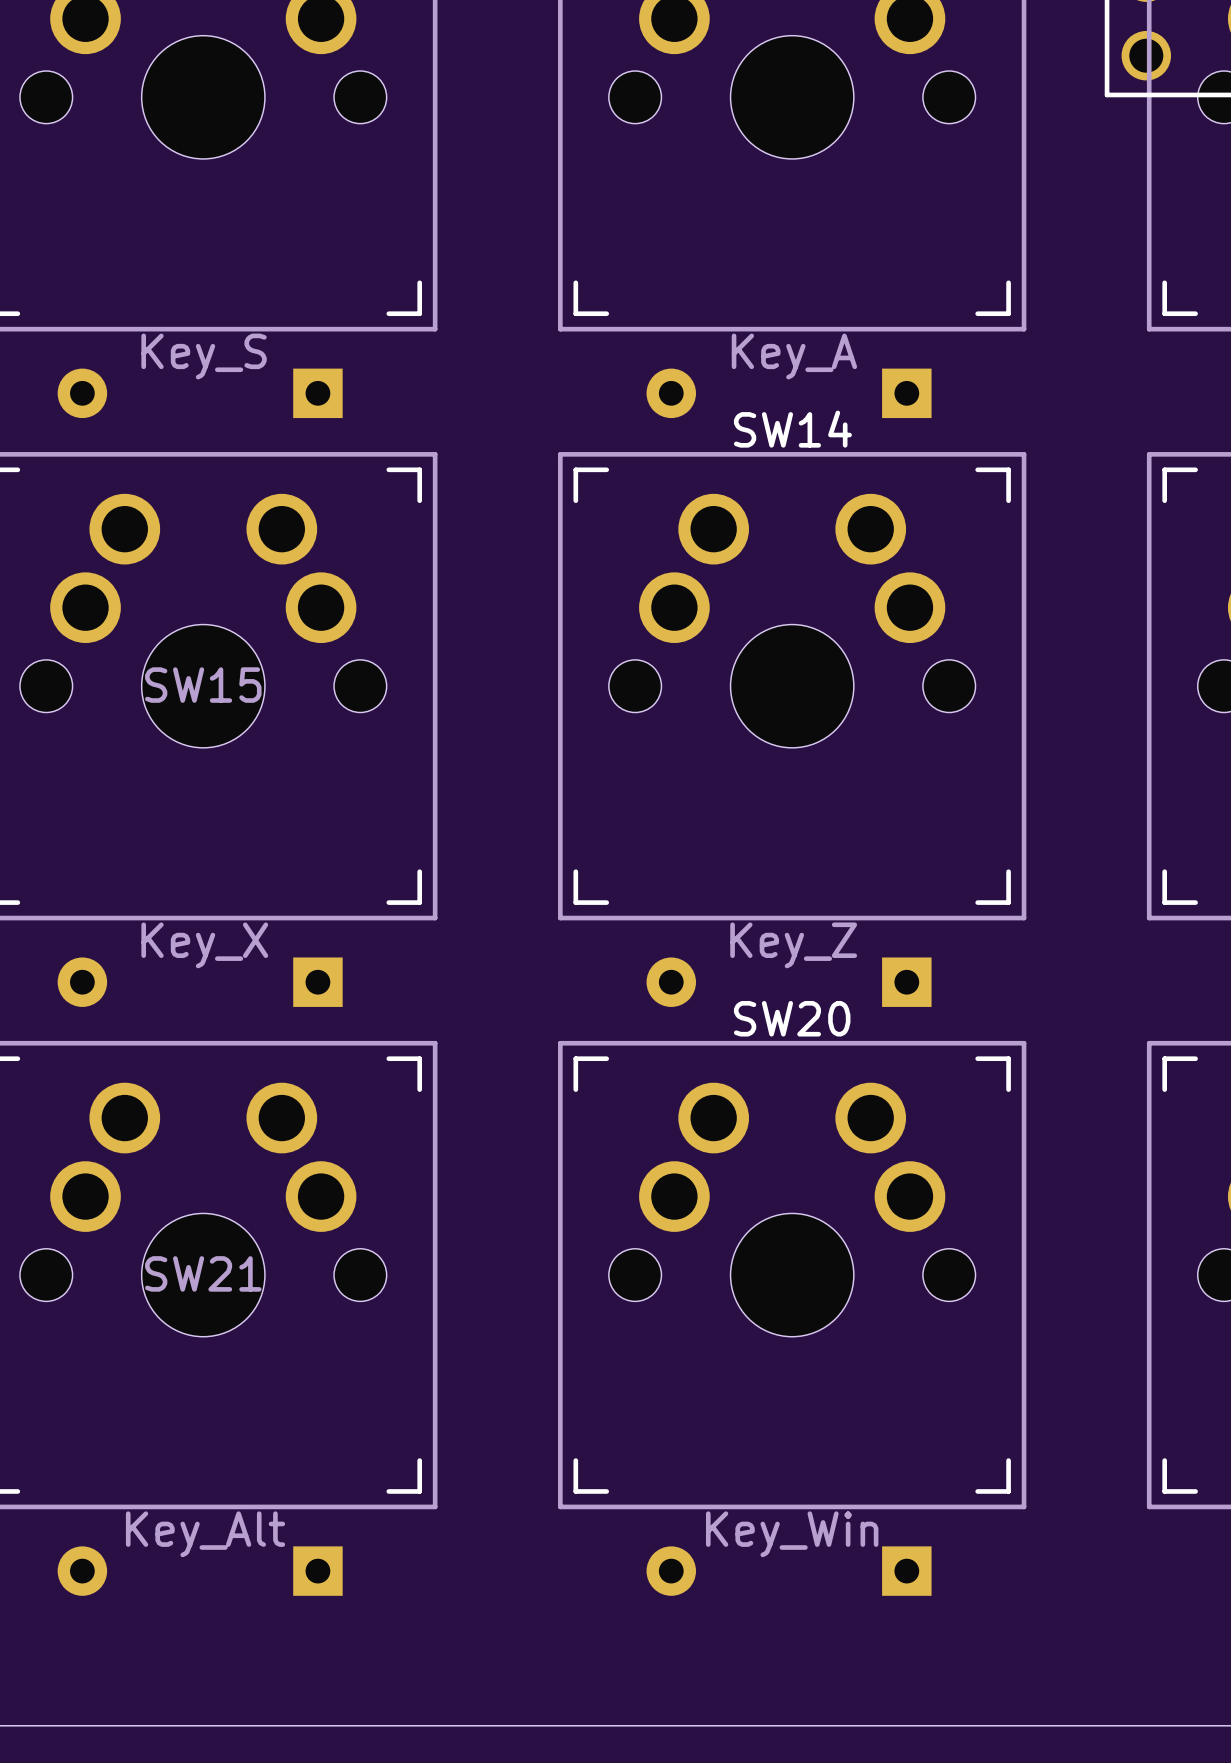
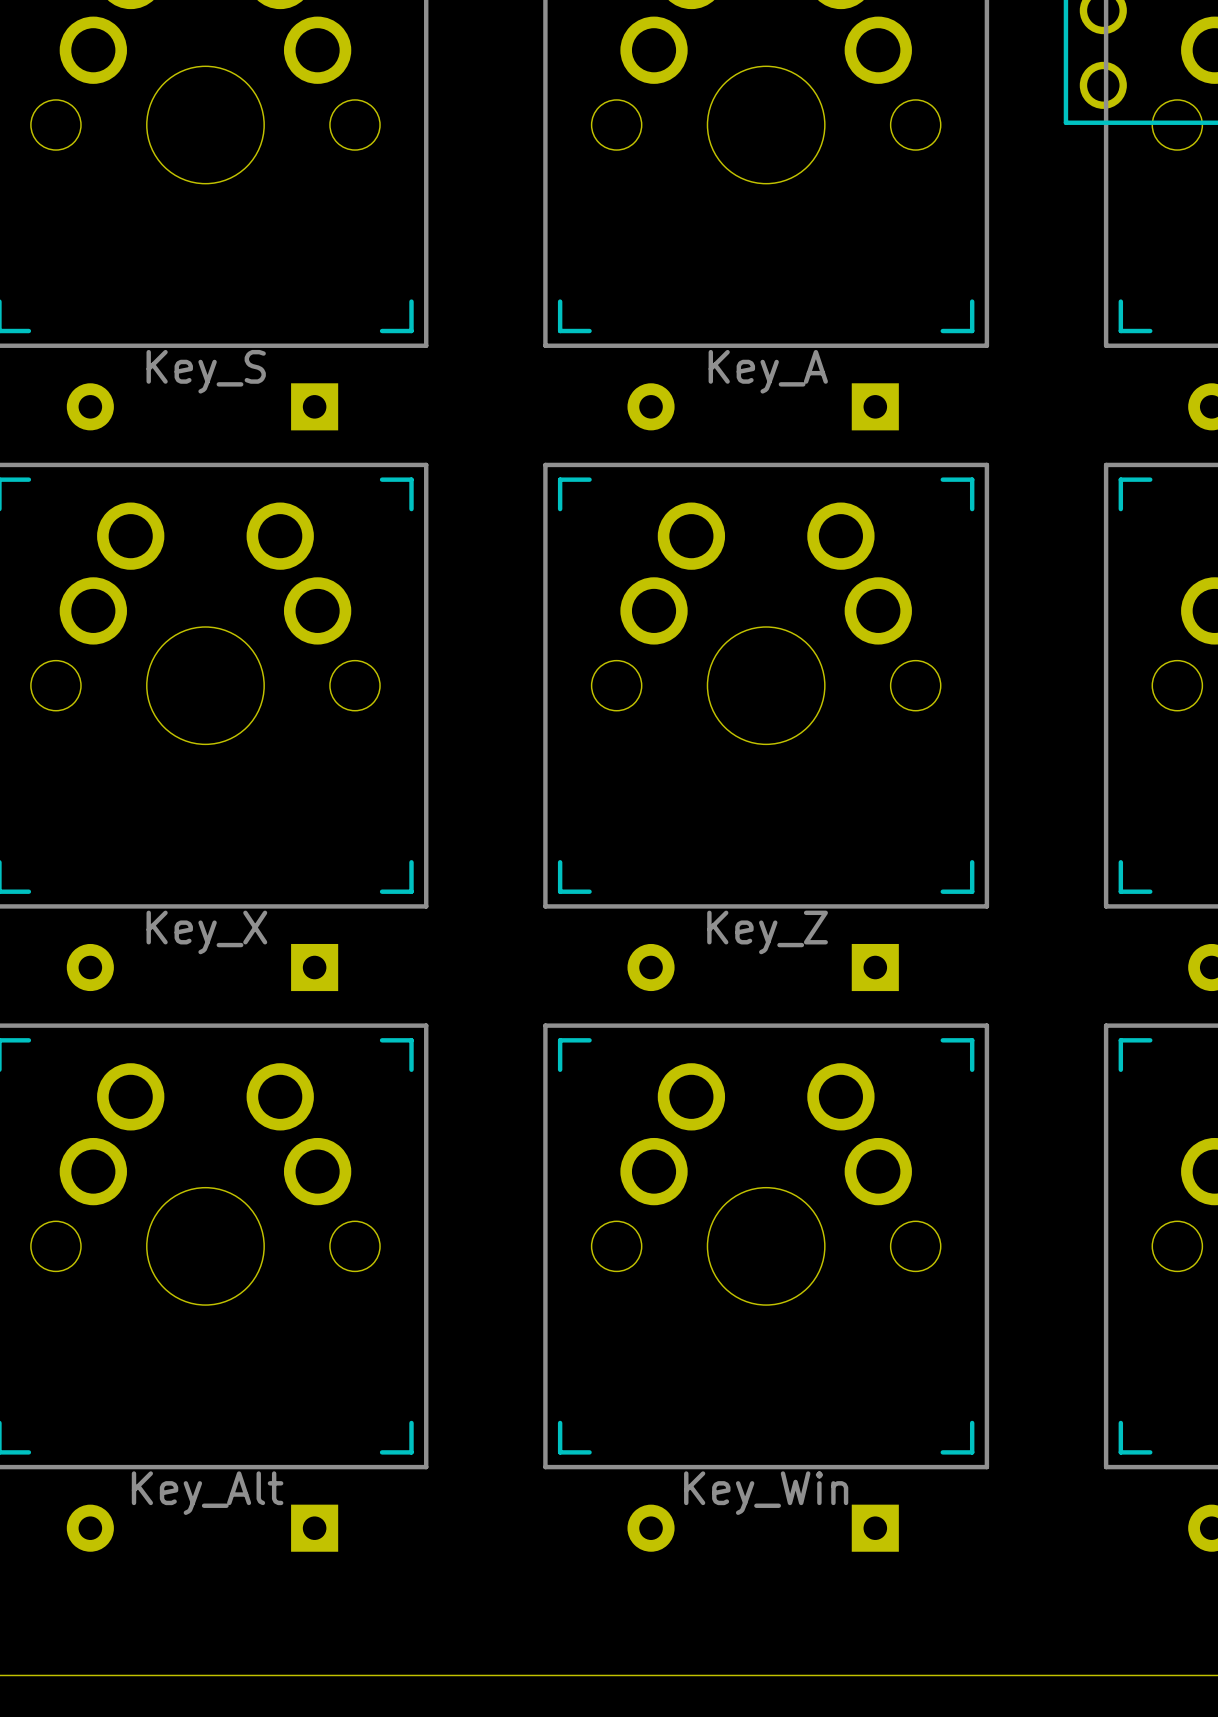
SW14 name: SW14 (792, 429) -> none
SW15 name: SW15 (203, 685) -> none
SW20 name: SW20 (792, 1018) -> none
SW21 name: SW21 (203, 1273) -> none

